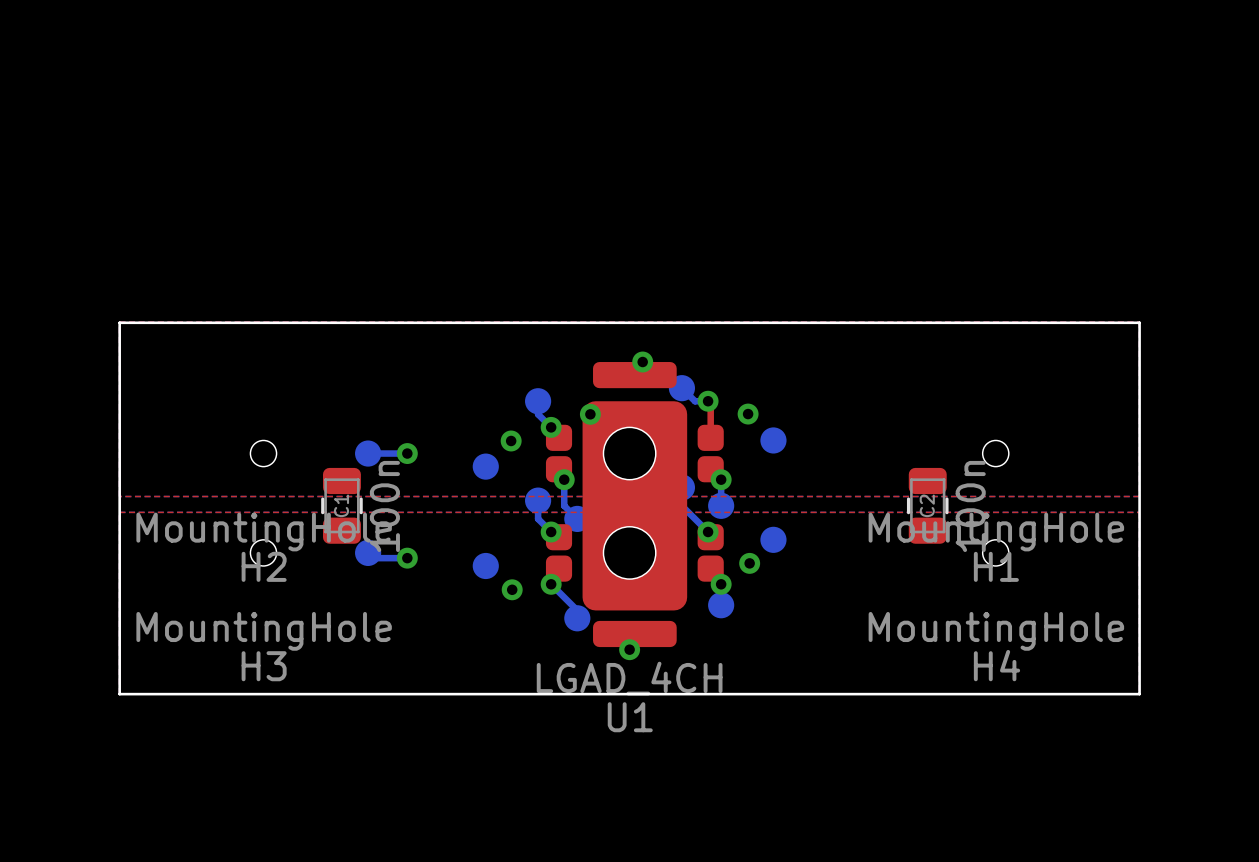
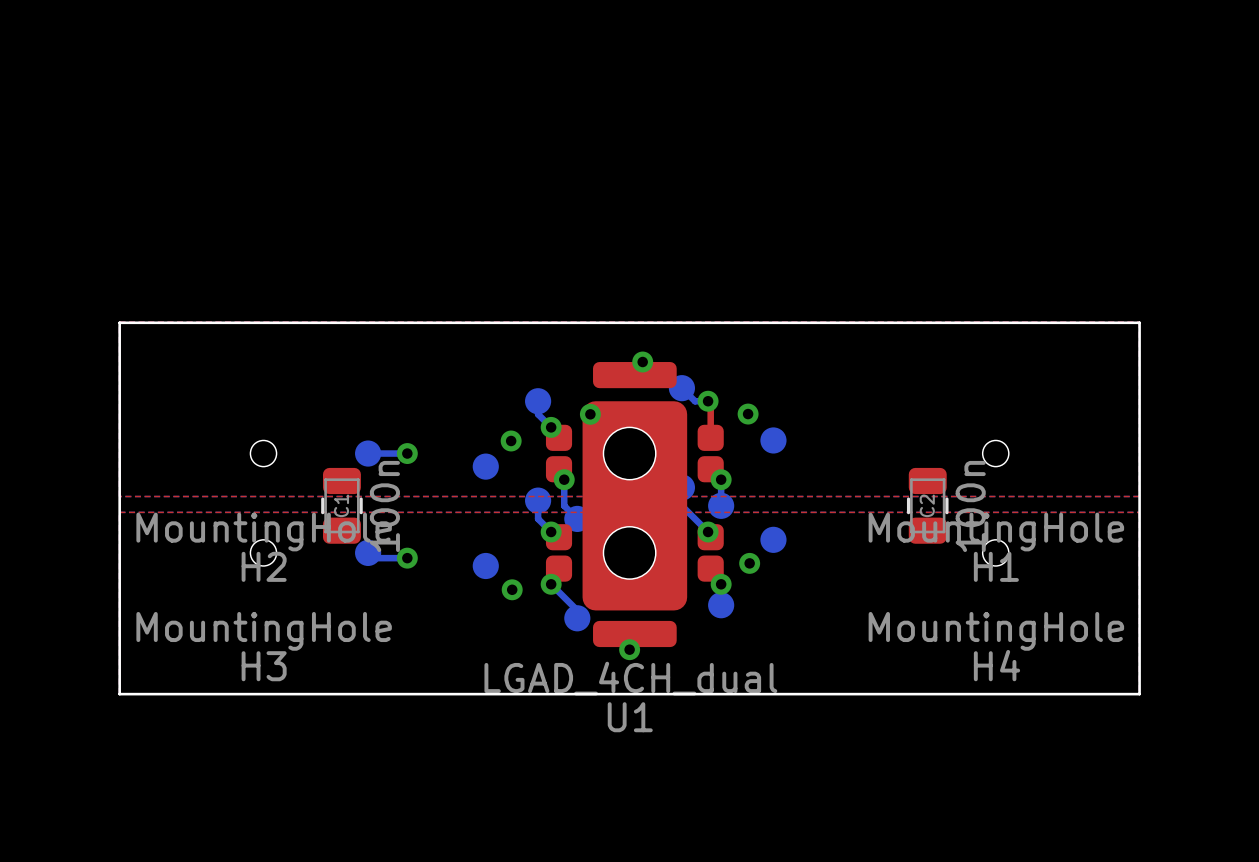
U1 value: LGAD_4CH (629, 678) -> LGAD_4CH_dual (630, 678)

